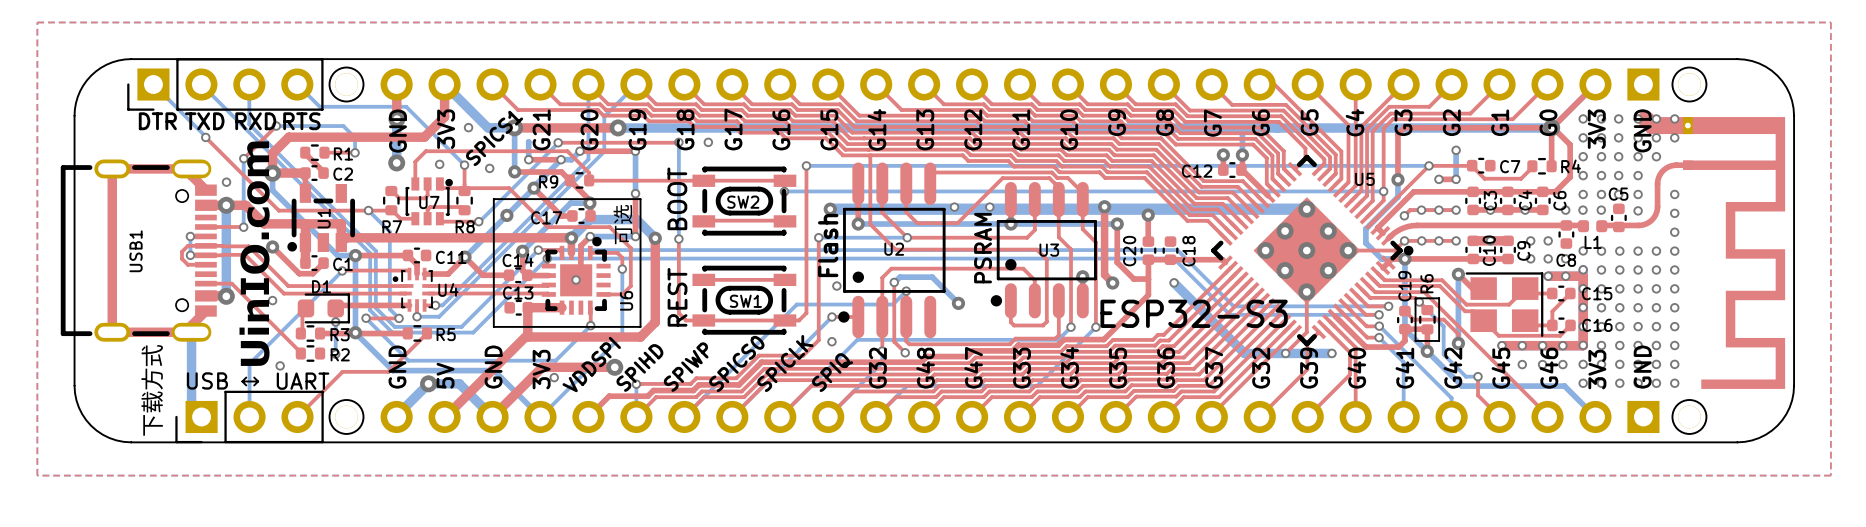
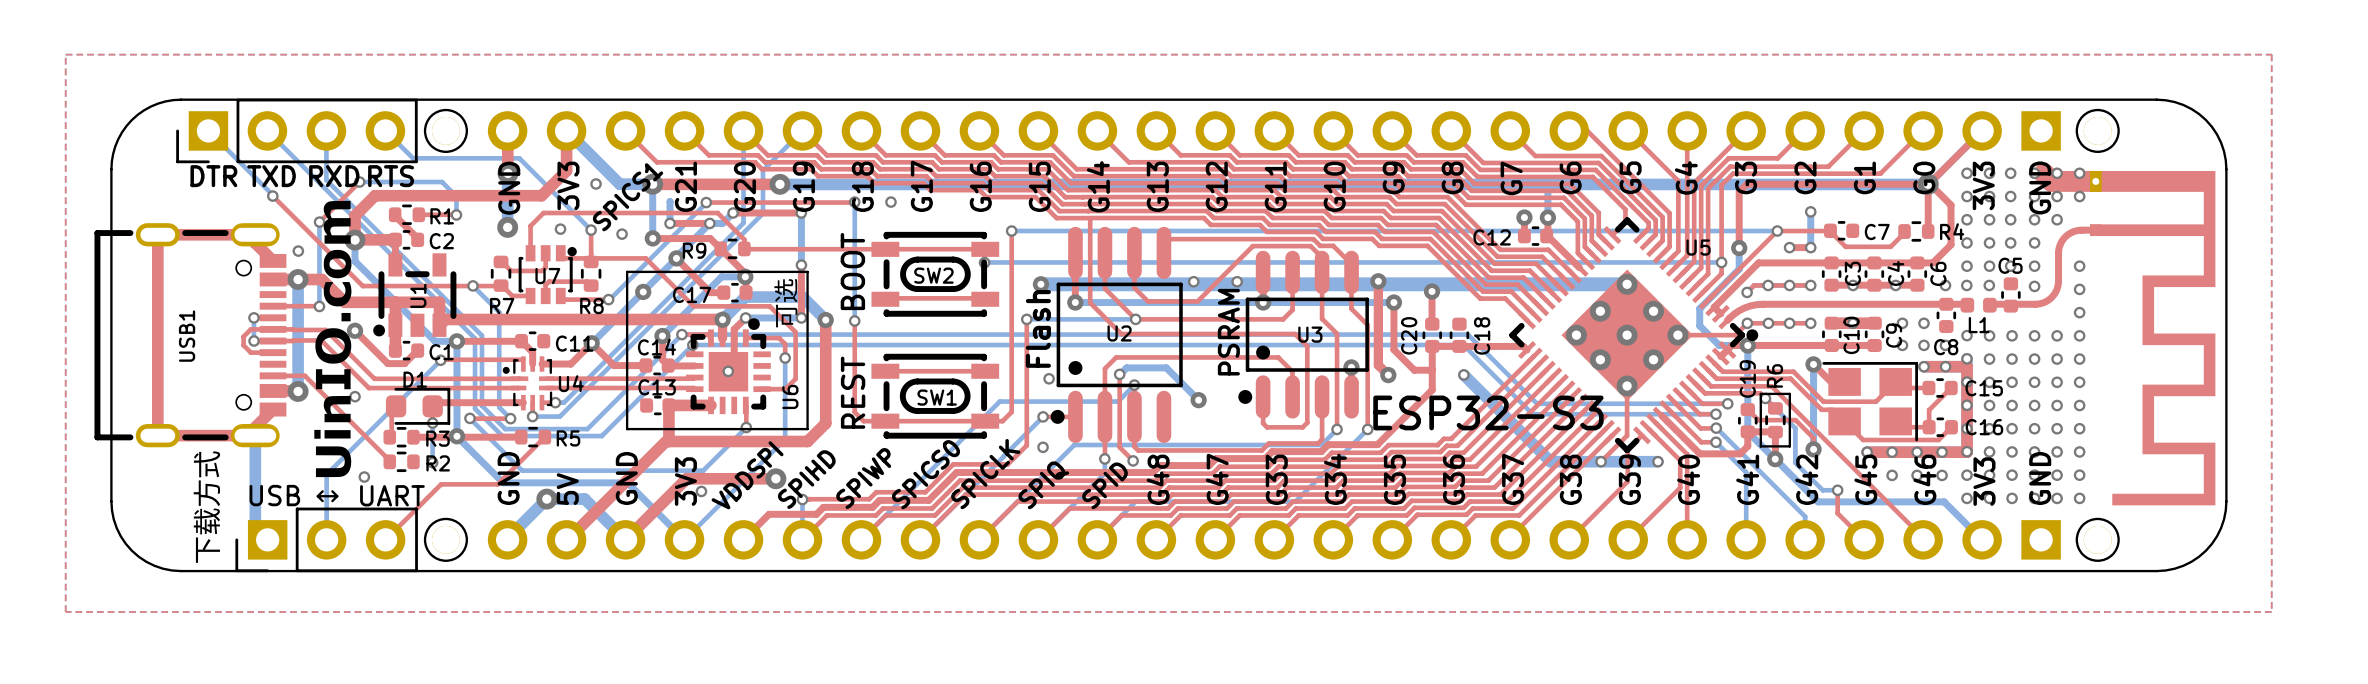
text: G32 (877, 368) -> SPID (1104, 485)
text: G32 (1261, 368) -> G38 (1570, 479)

